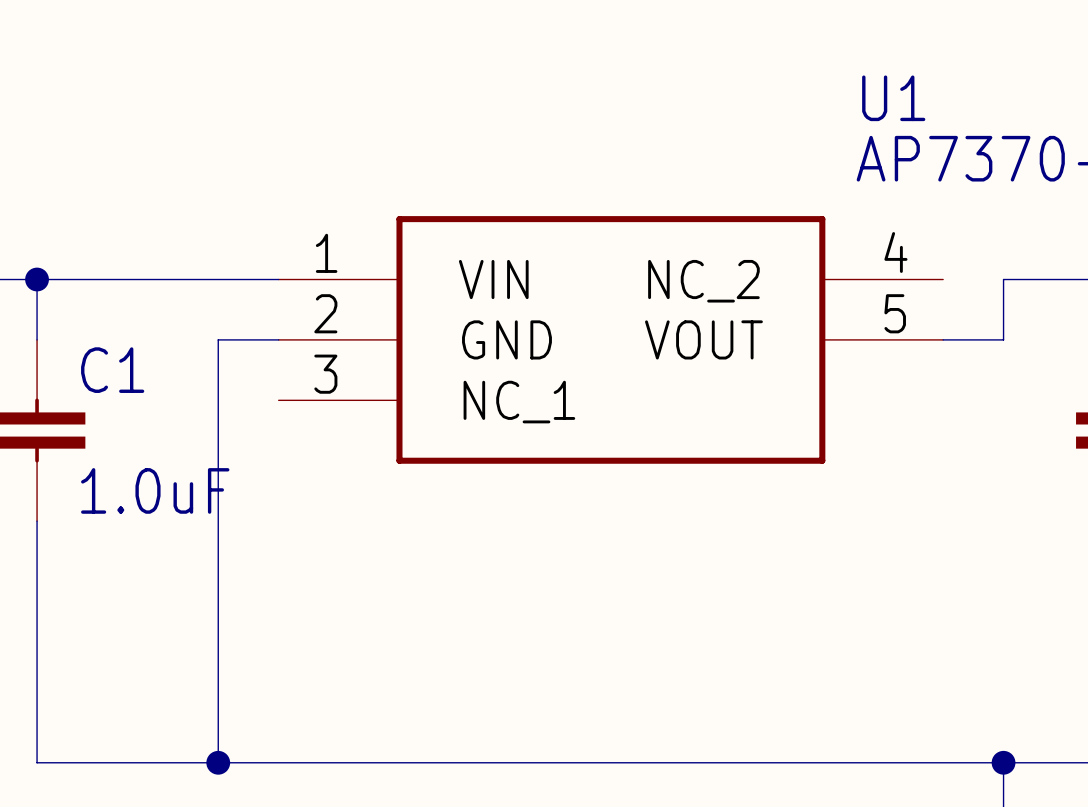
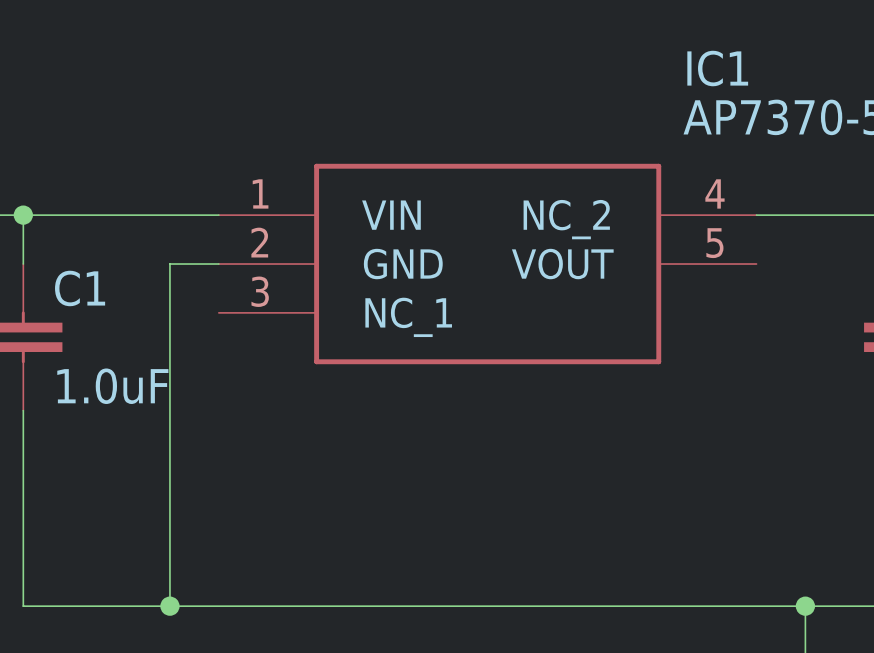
U1 name: U1 (893, 98) -> IC1 (717, 68)
wire: (1003, 279) (1003, 339) (943, 339) -> (805, 215) (756, 215)

